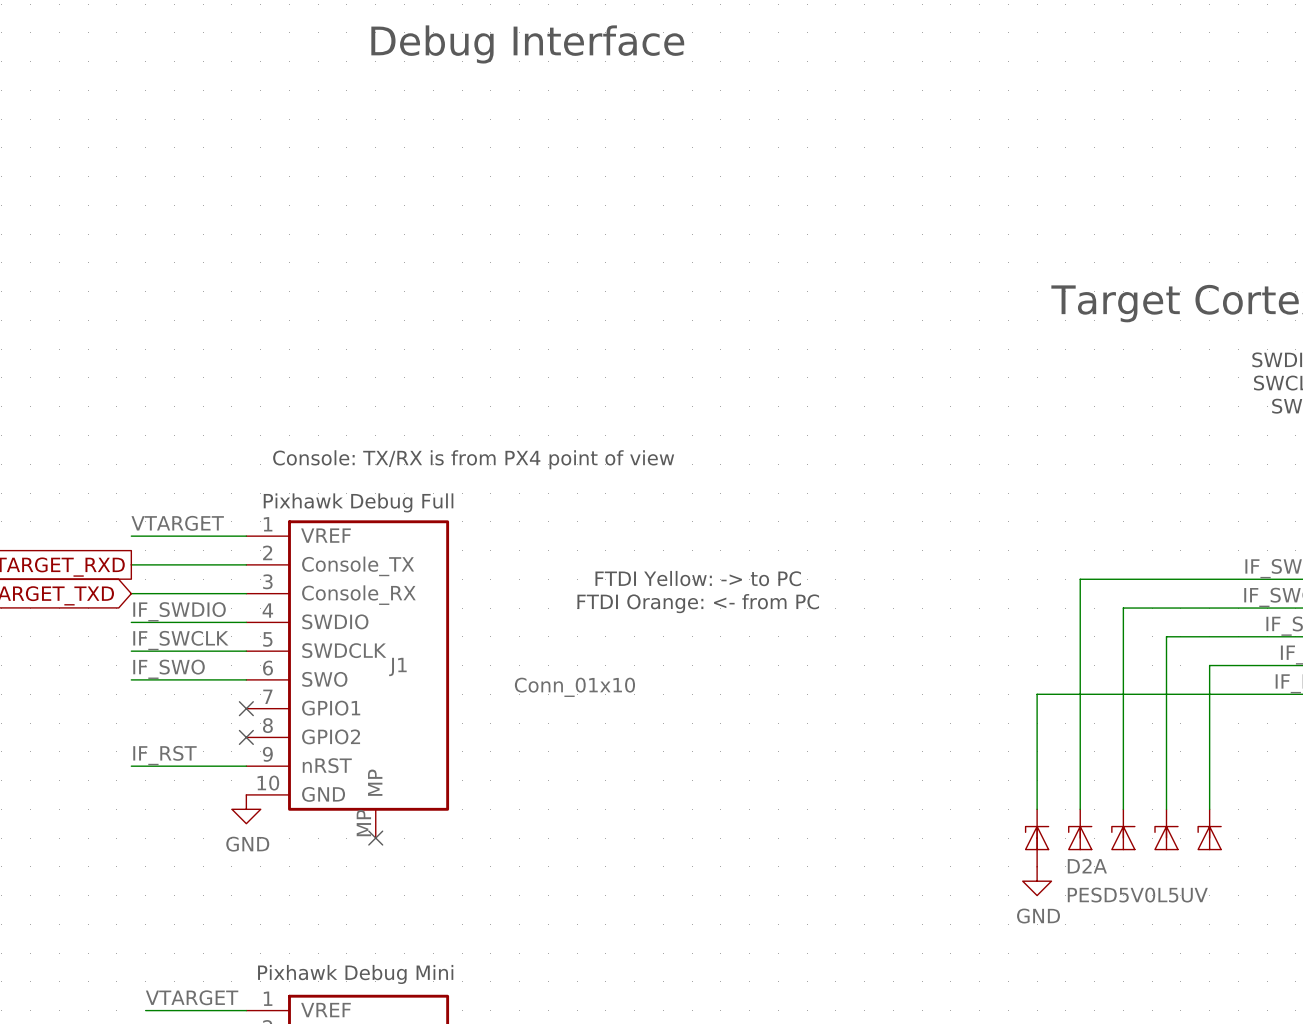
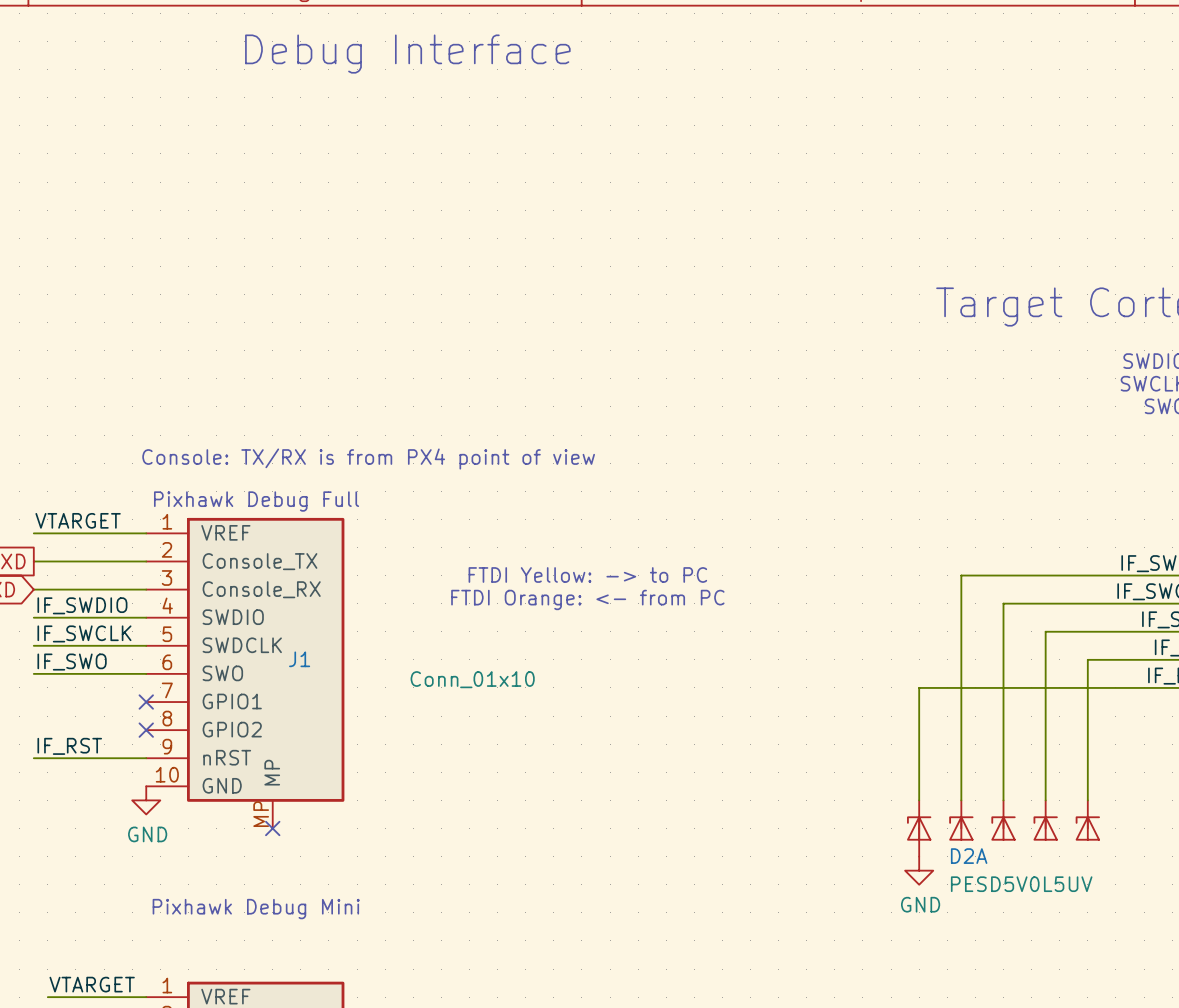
text position: Pixhawk Debug Mini (355, 974) -> Pixhawk Debug Mini (256, 909)

